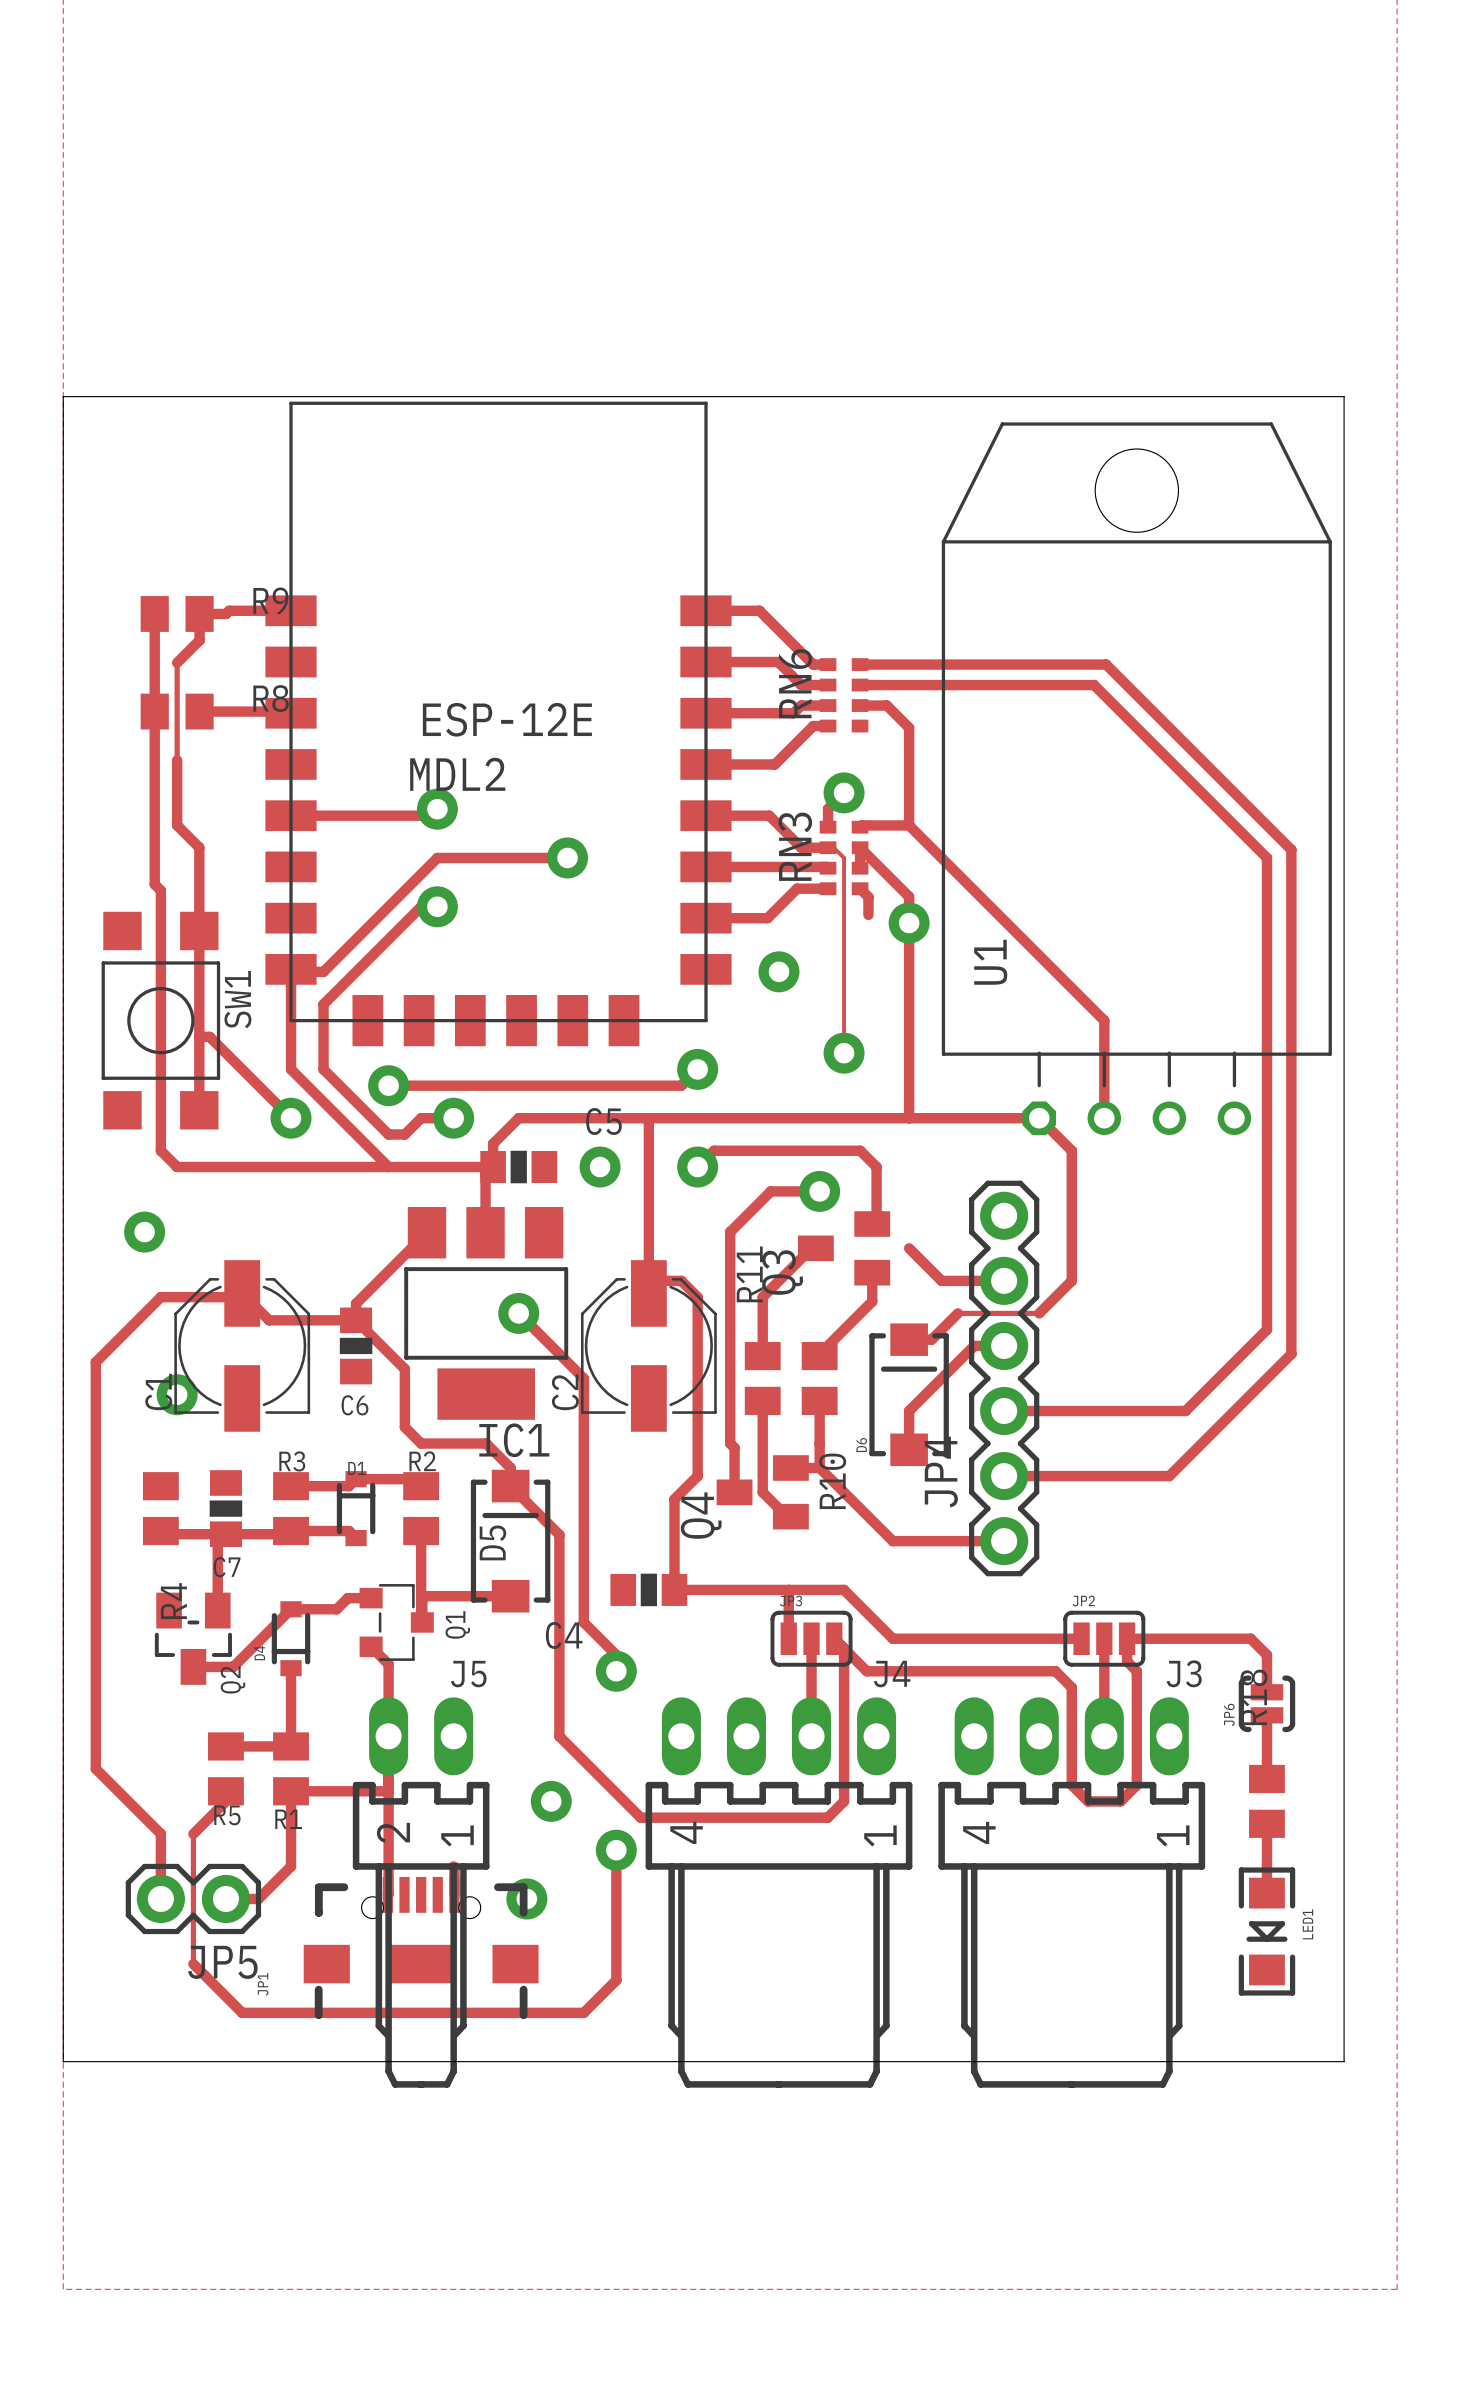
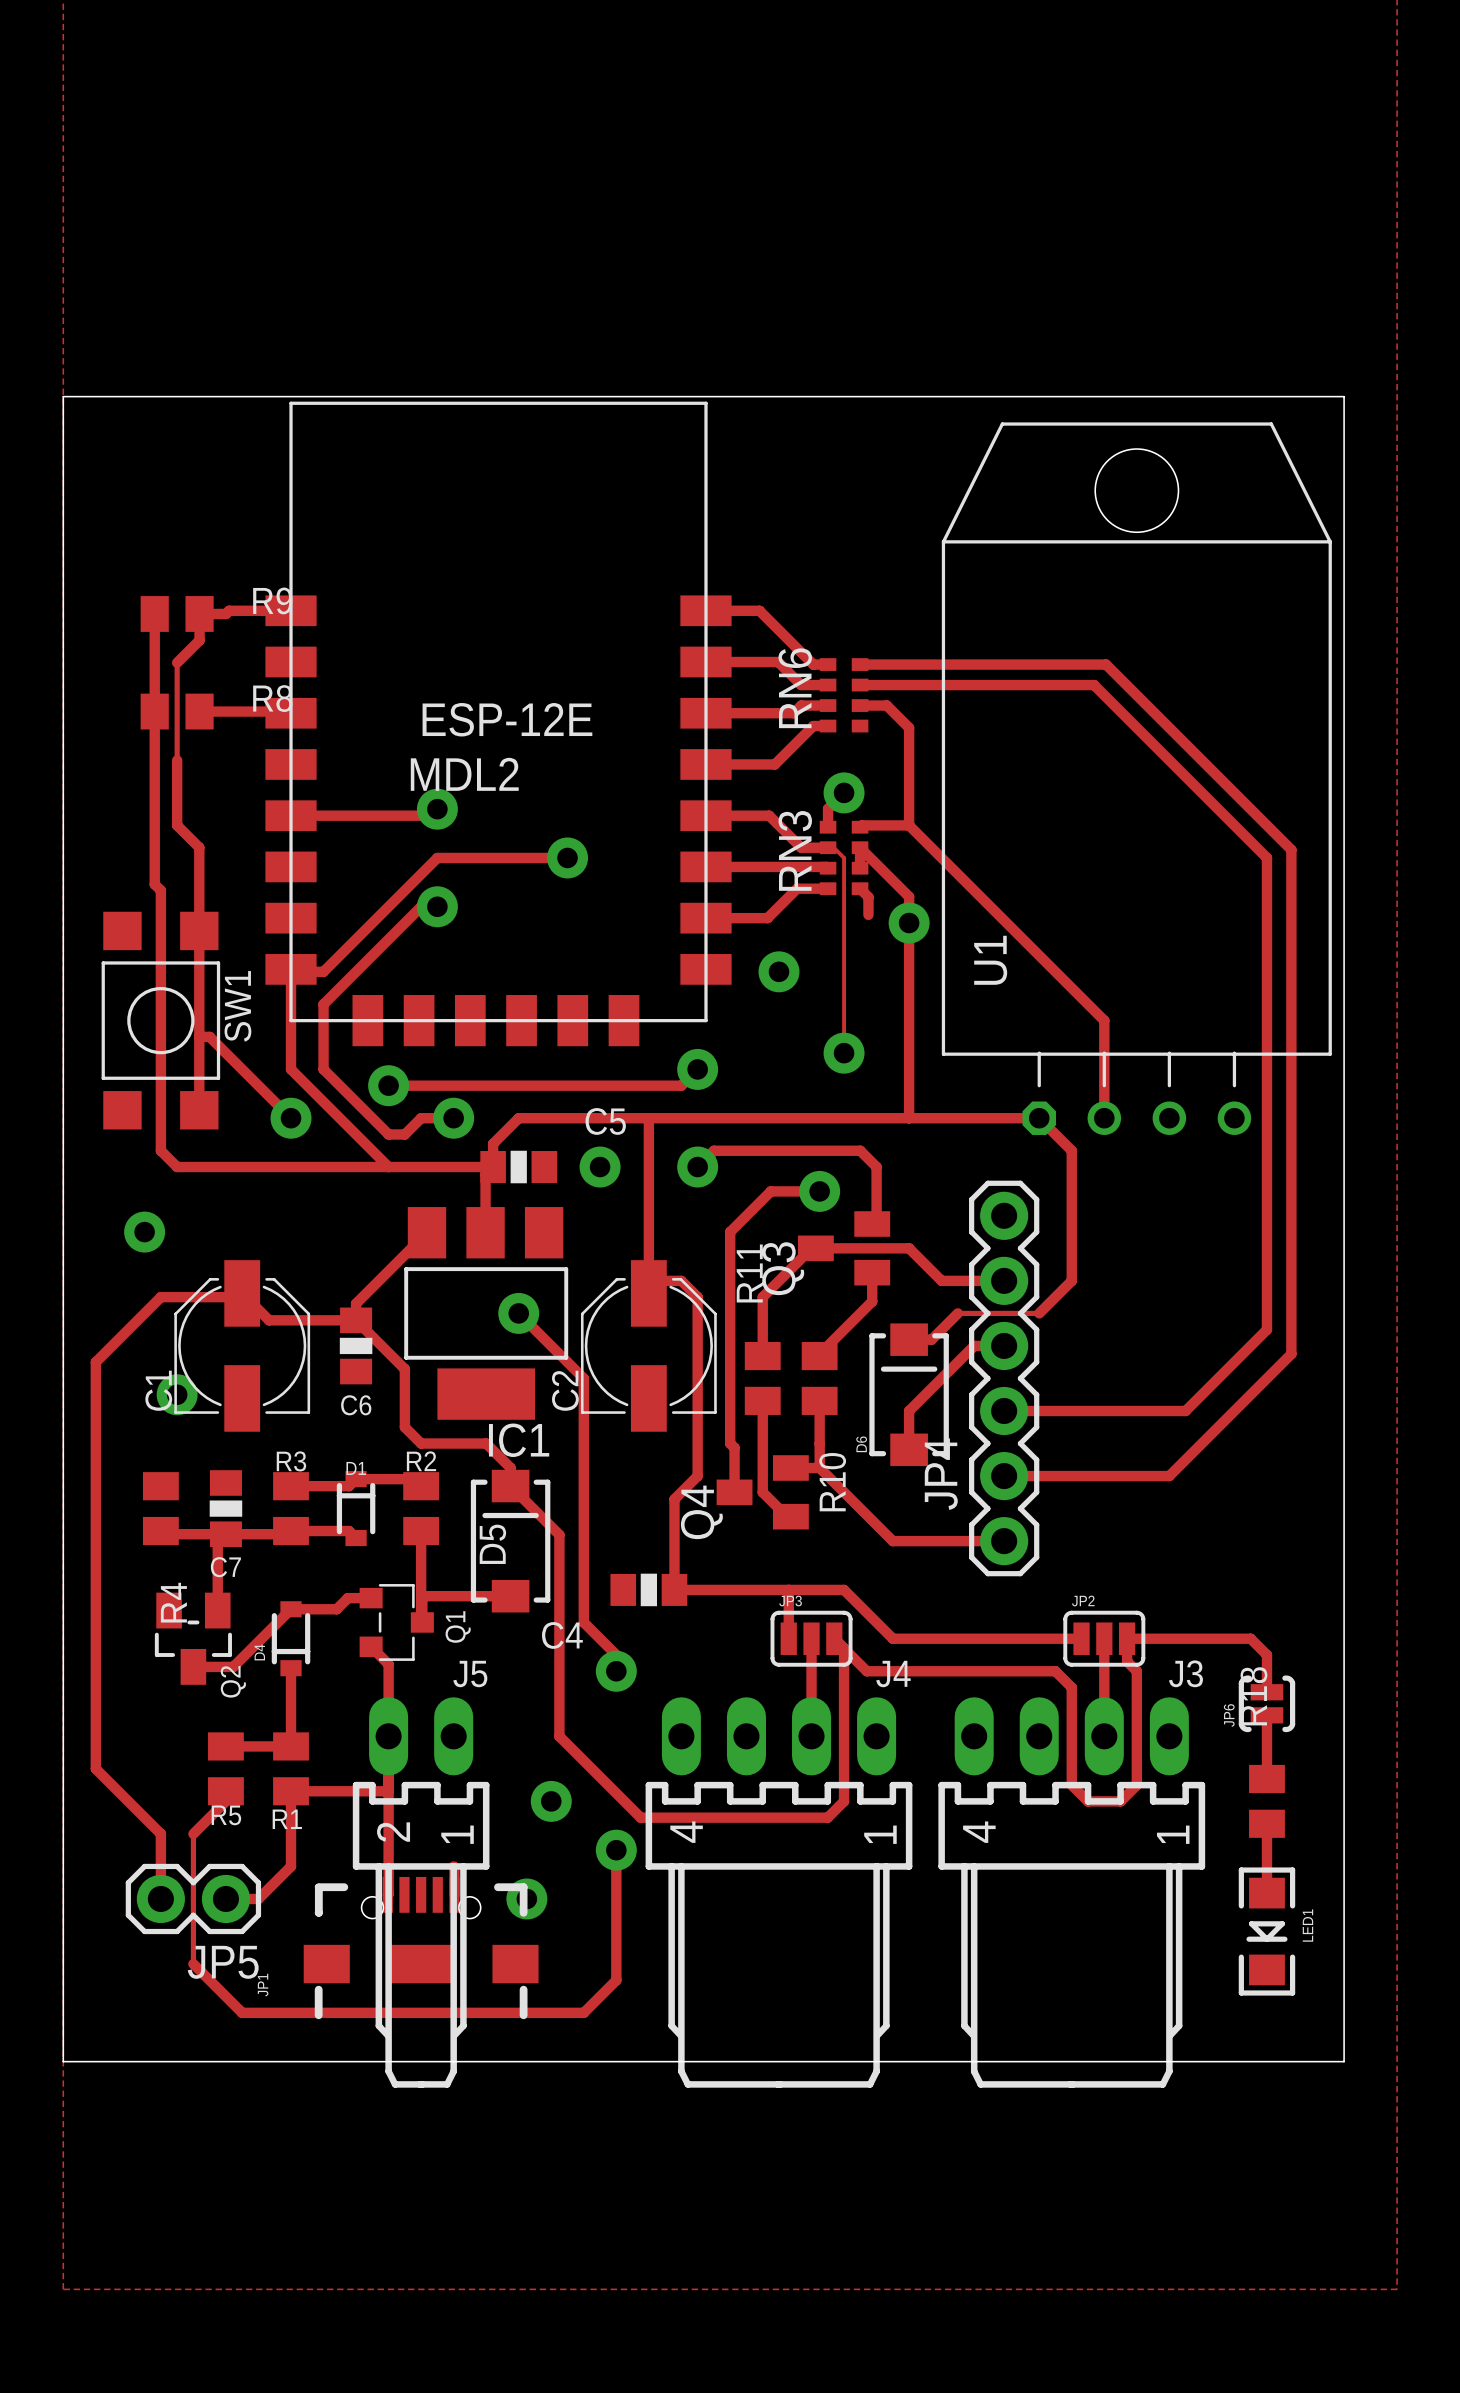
track: none -> (811, 1248) (909, 1248)

